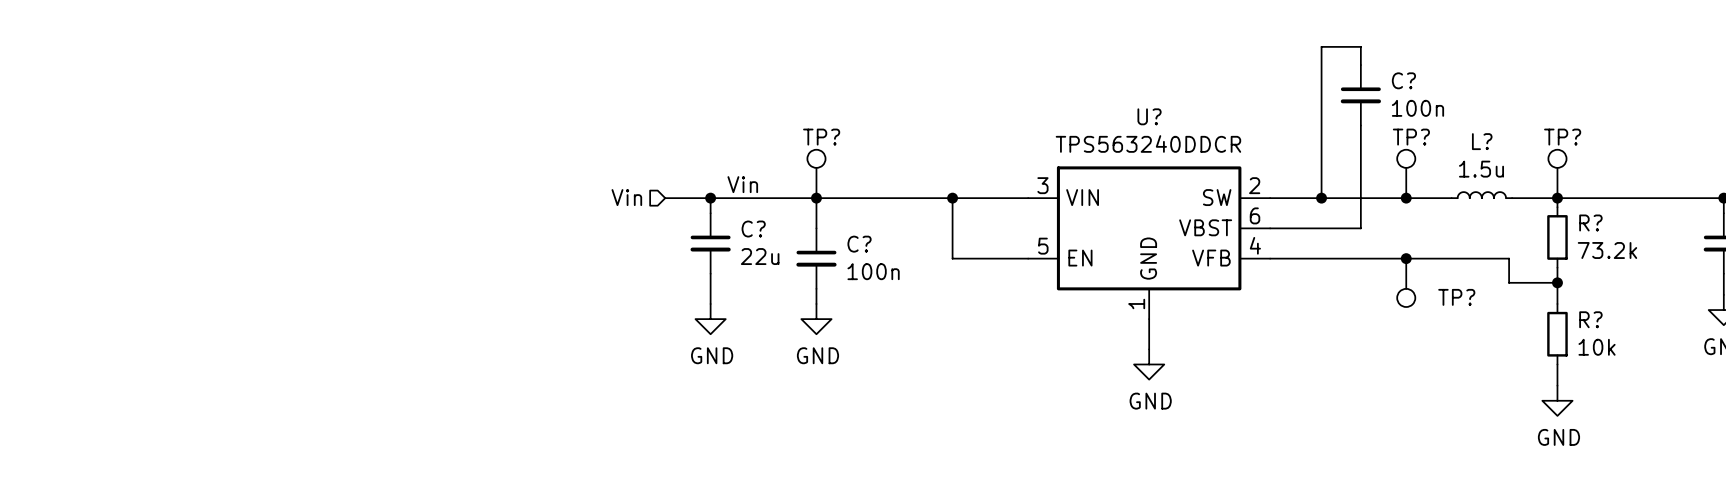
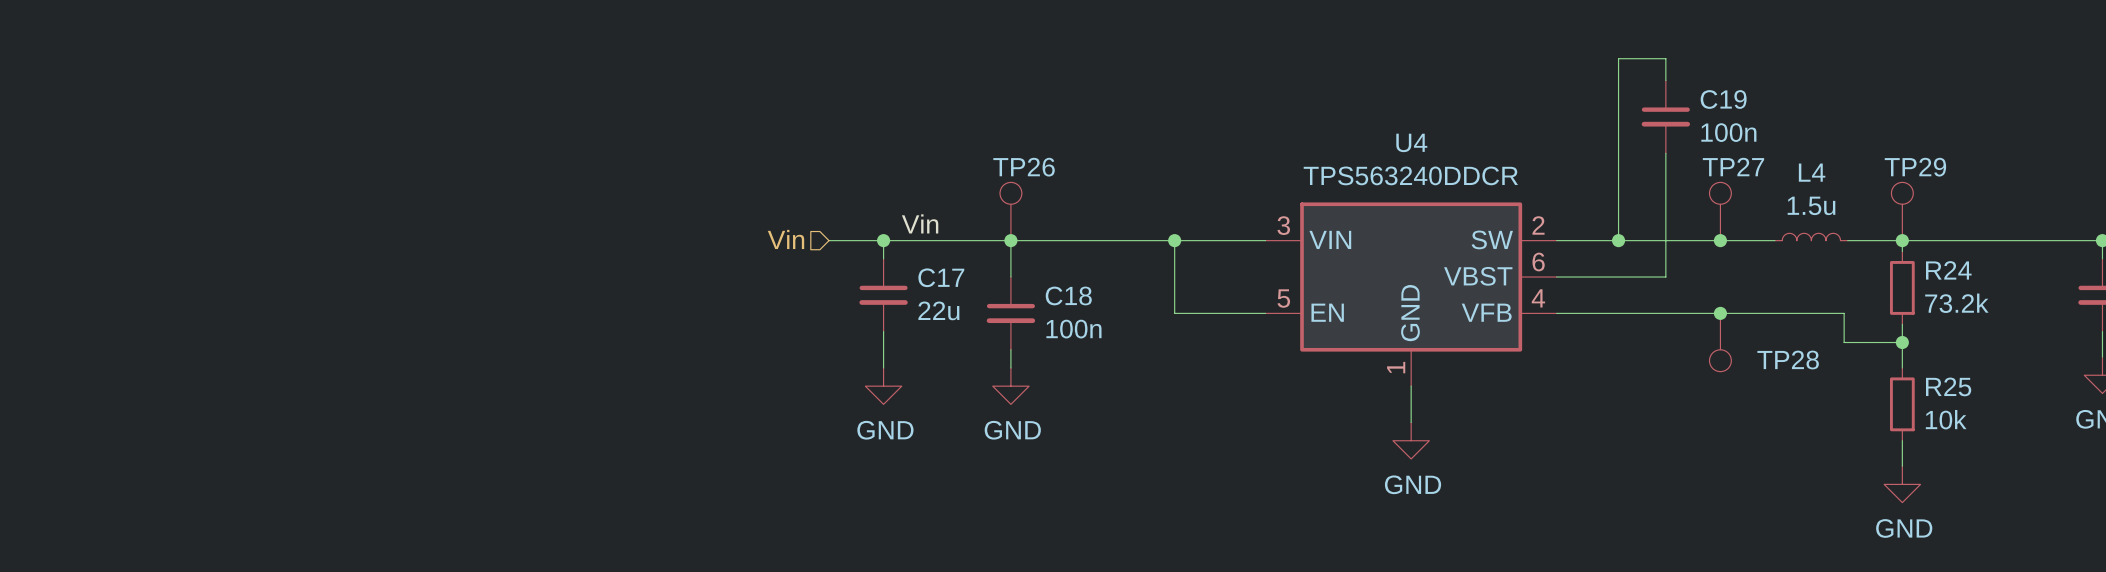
C? name: C? (1403, 80) -> C19 (1723, 99)
U? name: U? (1149, 116) -> U4 (1411, 142)
TP? name: TP? (821, 137) -> TP26 (1024, 167)
TP? name: TP? (1411, 137) -> TP27 (1733, 167)
TP? name: TP? (1562, 137) -> TP29 (1915, 167)
L? name: L? (1482, 141) -> L4 (1812, 172)
R? name: R? (1590, 222) -> R24 (1948, 270)
C? name: C? (753, 229) -> C17 (941, 277)
C? name: C? (859, 244) -> C18 (1068, 295)
TP? name: TP? (1456, 297) -> TP28 (1788, 360)
R? name: R? (1590, 319) -> R25 (1948, 386)

